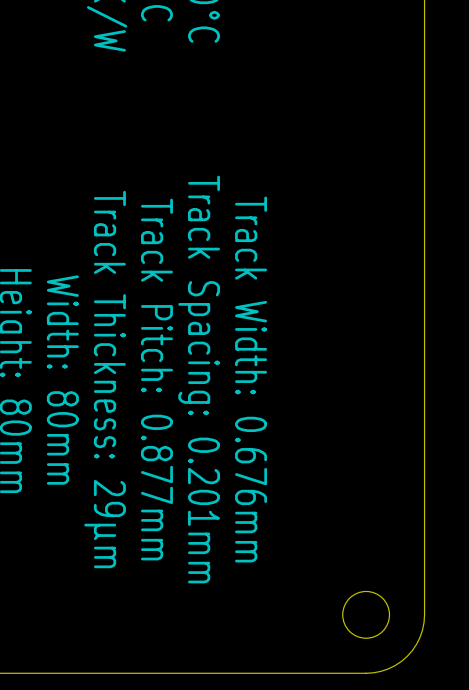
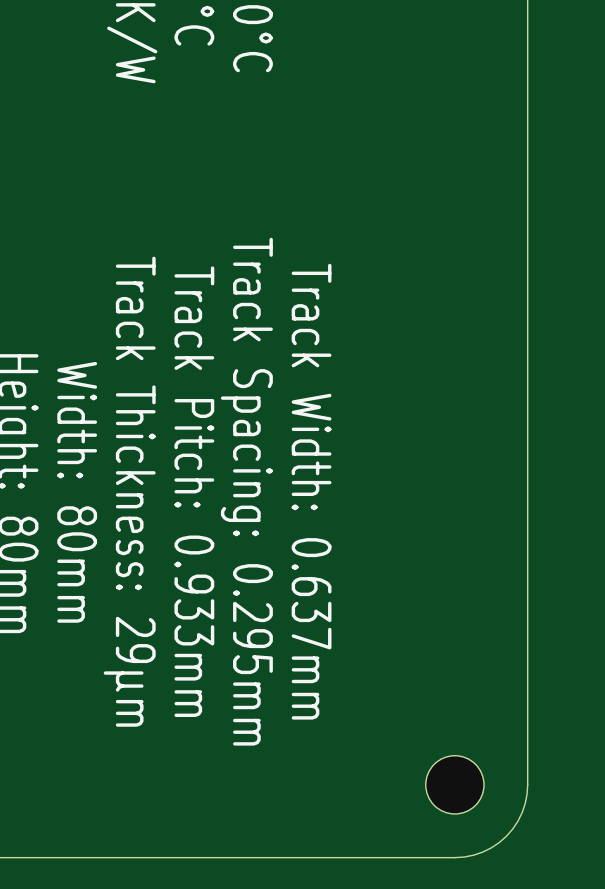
text: Track Pitch: 0.877mm (156, 379) -> Track Pitch: 0.933mm (194, 491)
text: Track Spacing: 0.201mm (199, 379) -> Track Spacing: 0.295mm (246, 491)
text: Track Width: 0.676mm (251, 379) -> Track Width: 0.637mm (311, 491)

